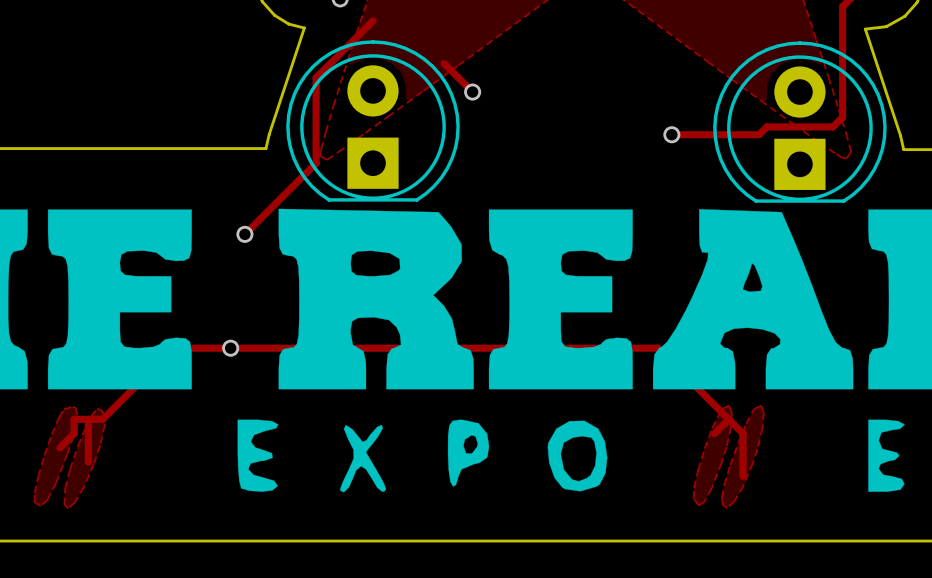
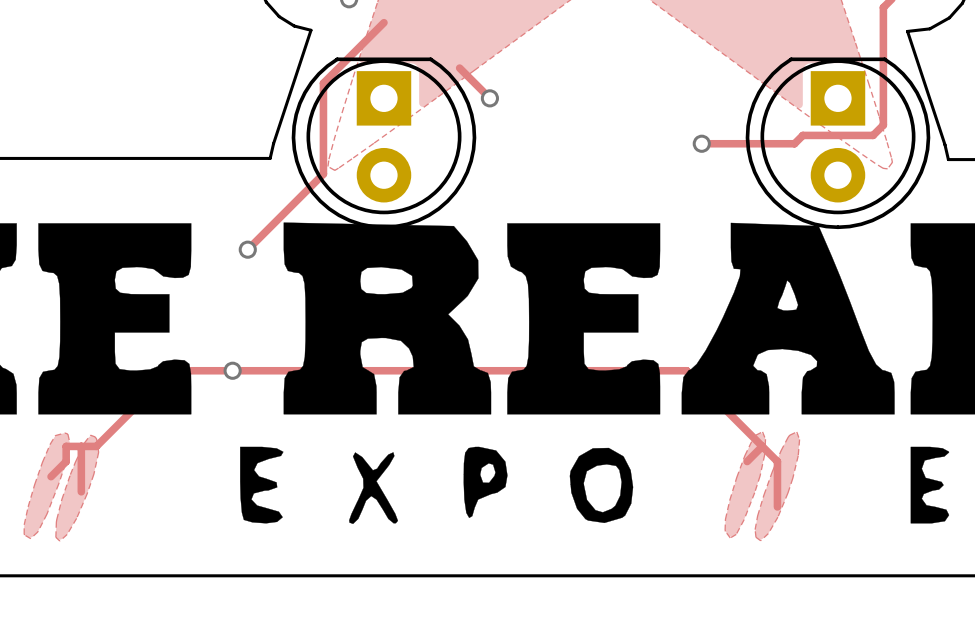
part rotation: 0° (373, 120) -> 180° (383, 143)
part rotation: 0° (799, 122) -> 180° (837, 143)

